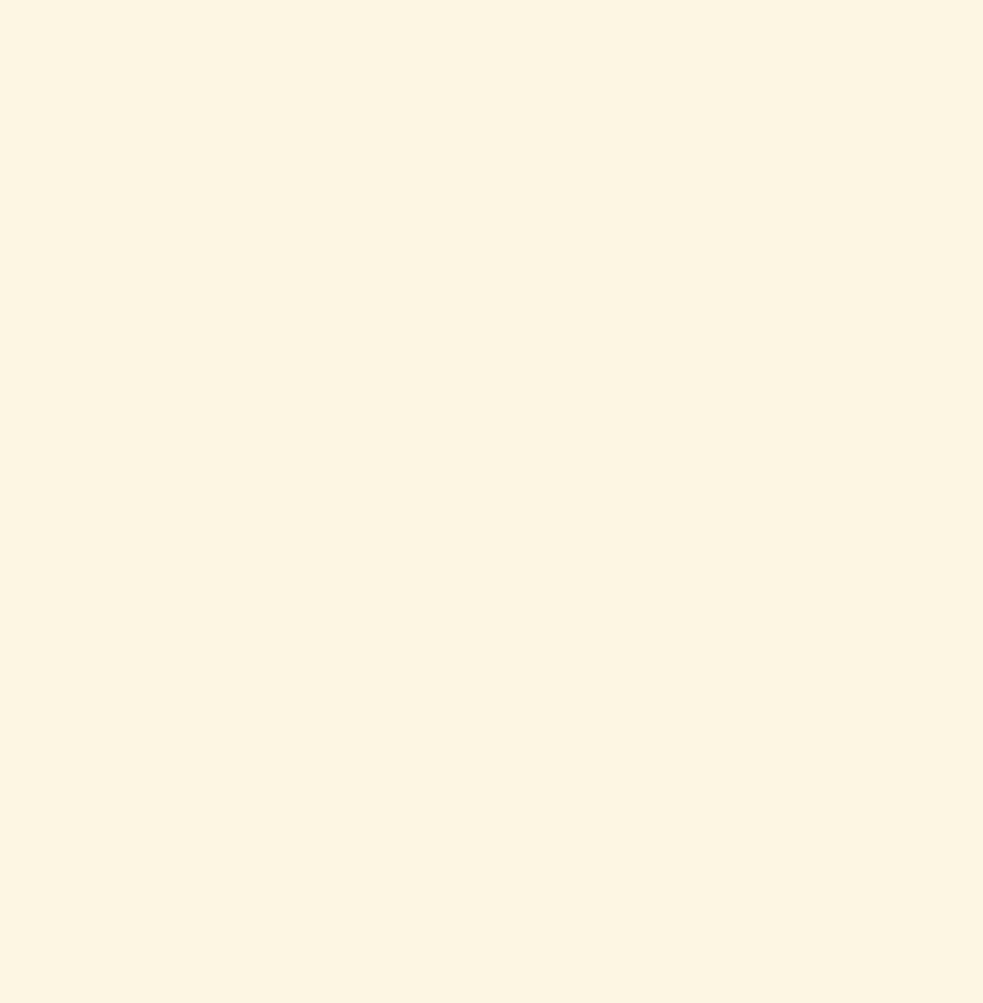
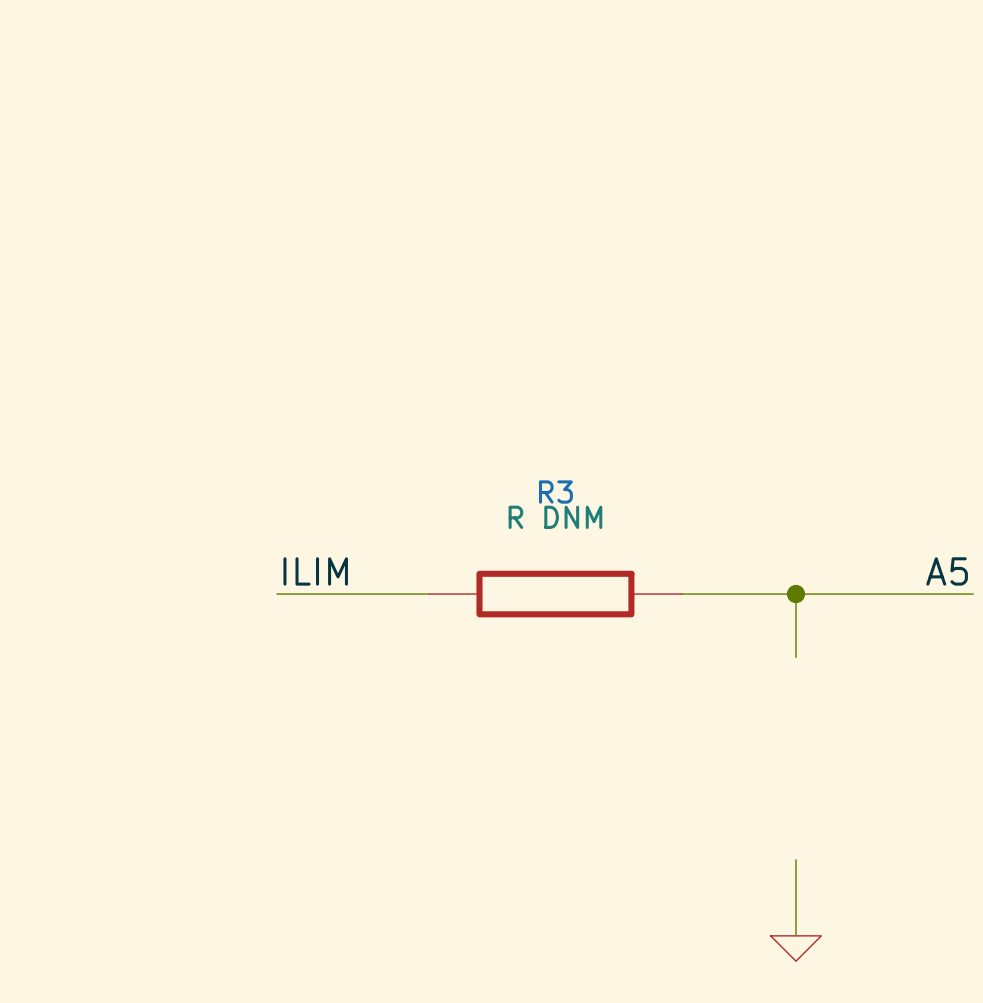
label: none -> ILIM (315, 571)
label: none -> A5 (947, 571)
wire: none -> (276, 594) (428, 594)
R3: none -> R DNM (555, 594)
wire: none -> (682, 594) (973, 594)
wire: none -> (795, 594) (795, 657)
junction: none -> (795, 594)
wire: none -> (795, 859) (795, 935)
power symbol: none -> (795, 948)

